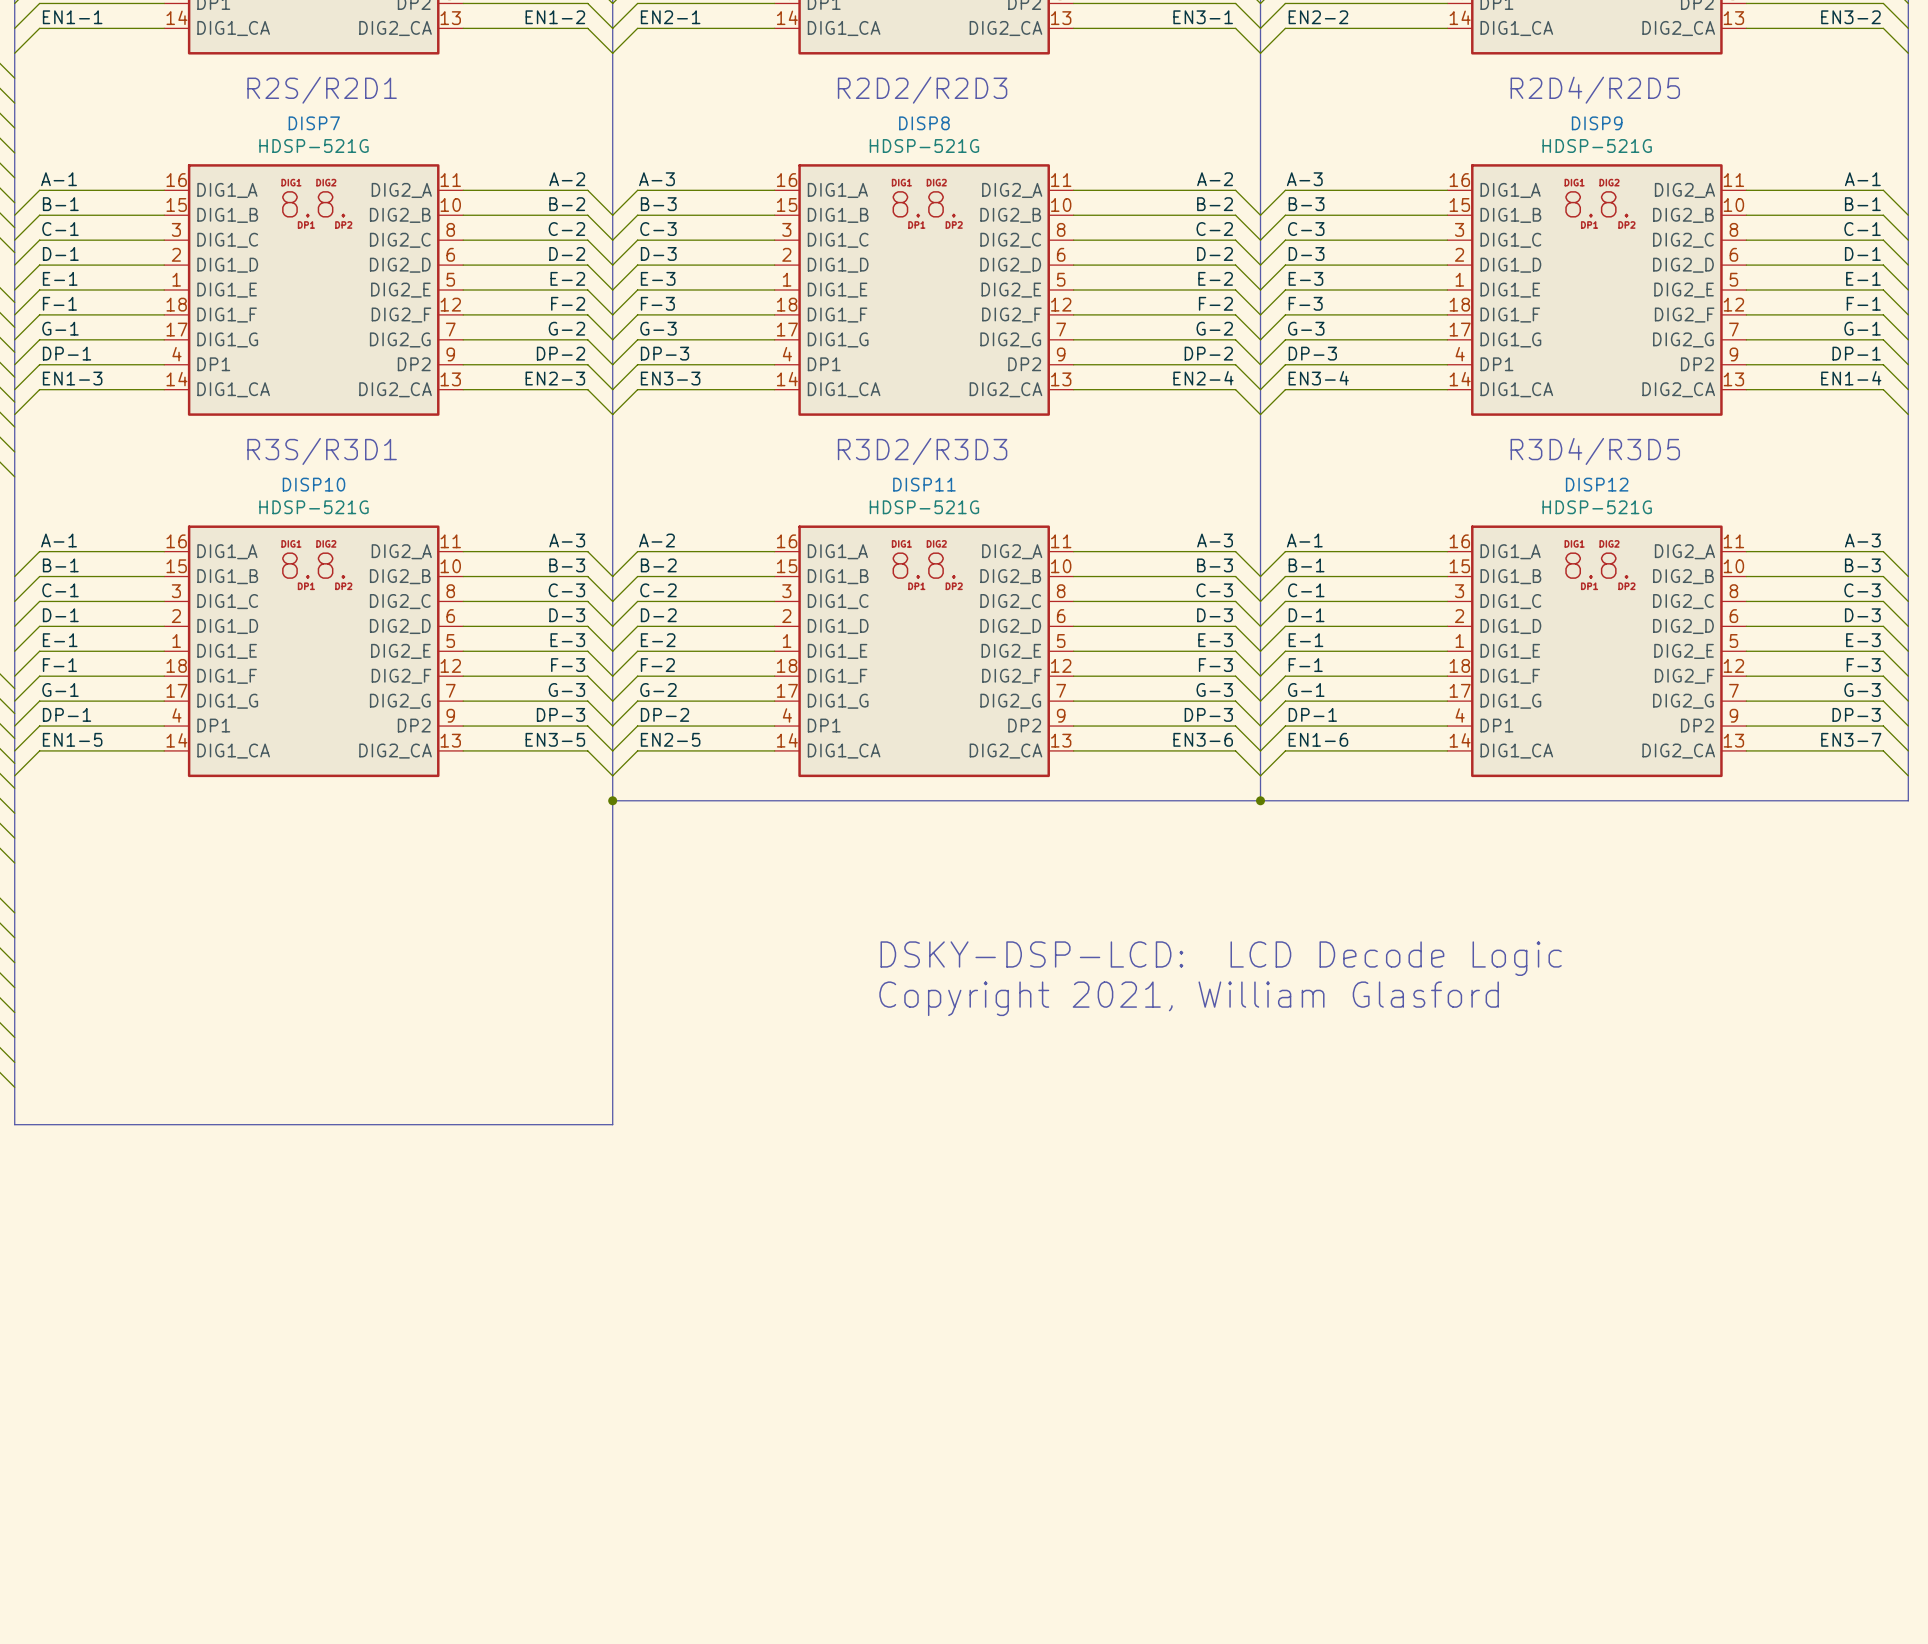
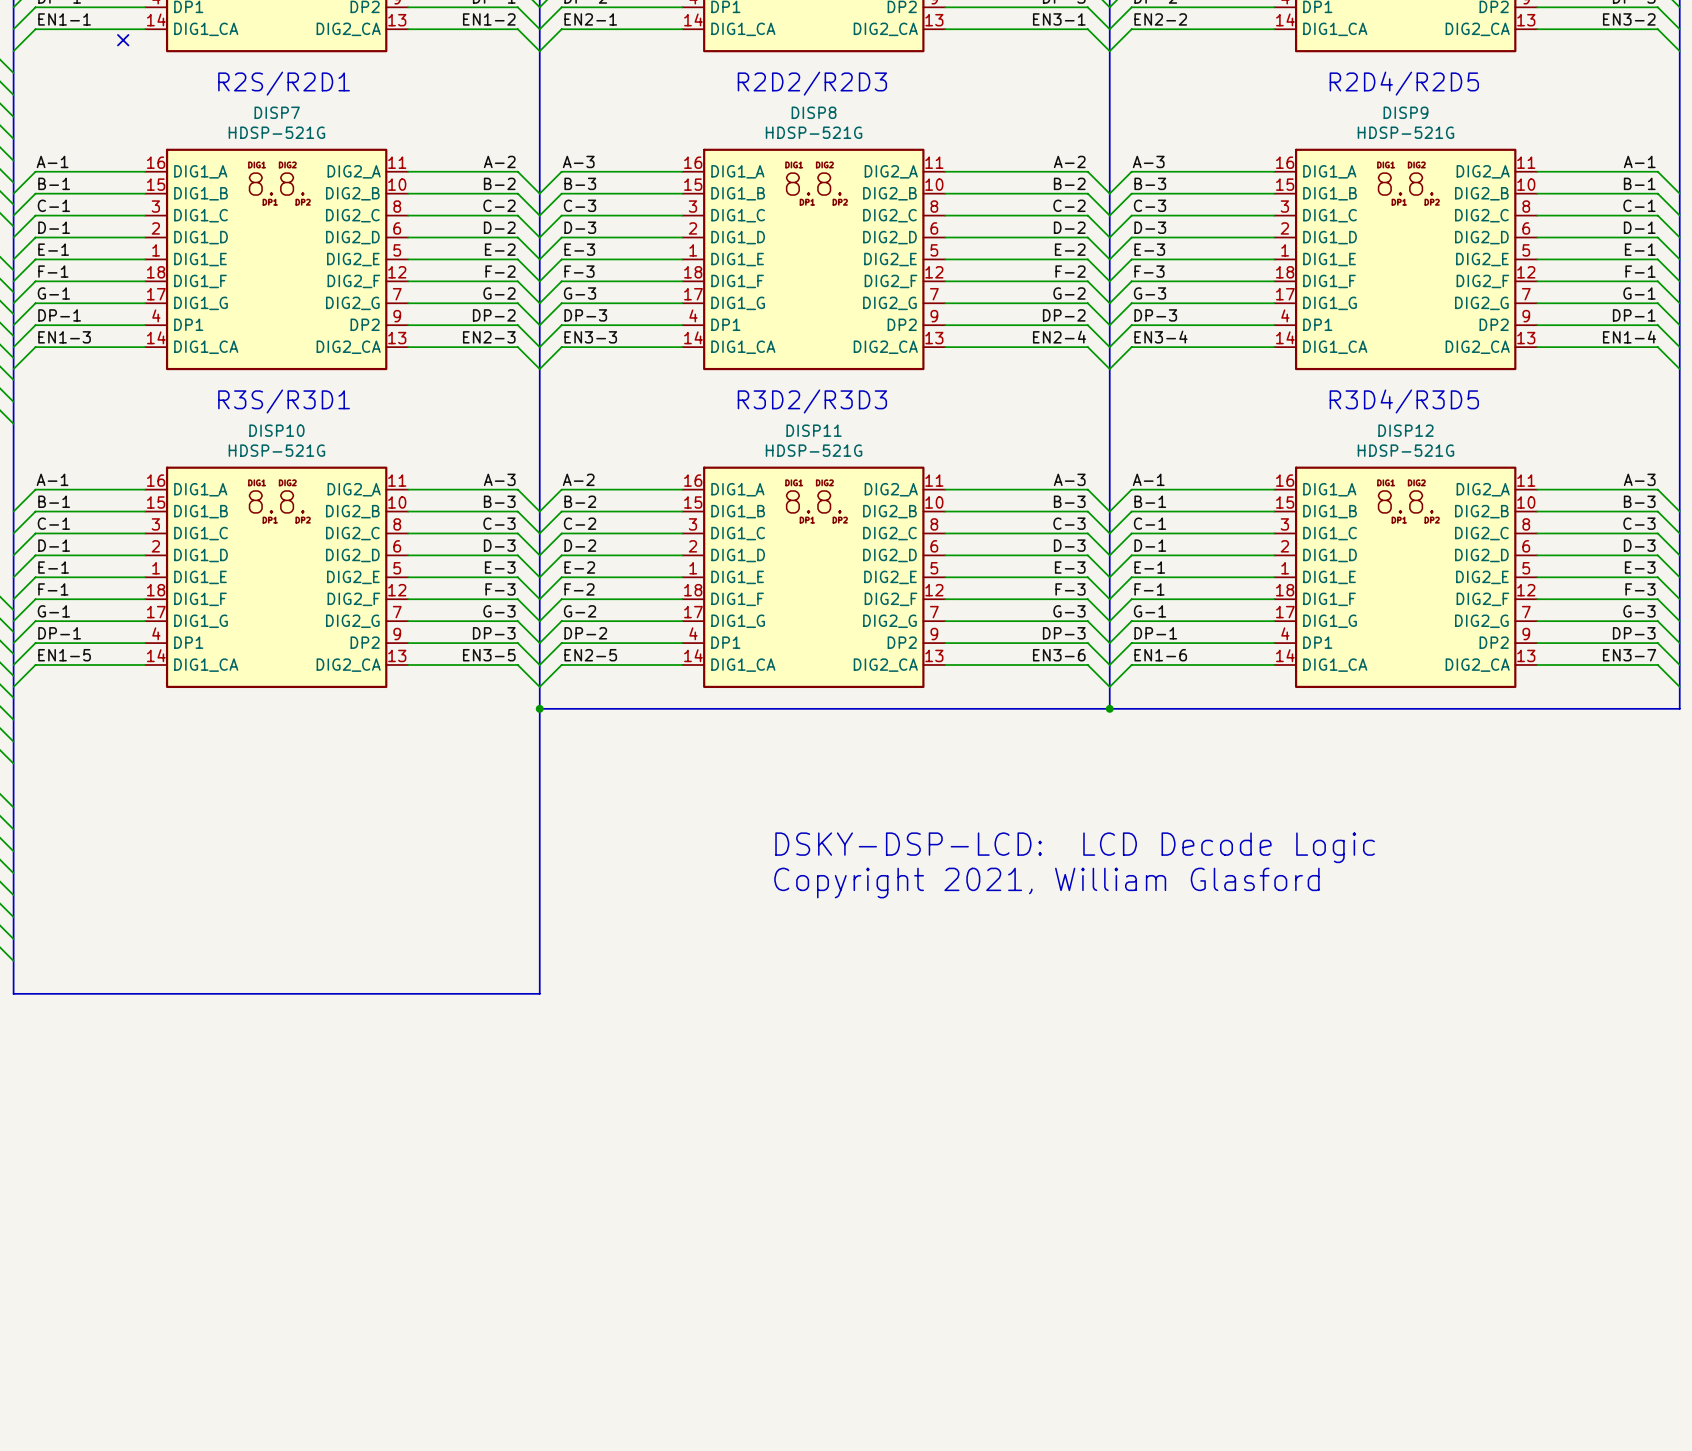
no-connect mark: none -> (123, 40)

